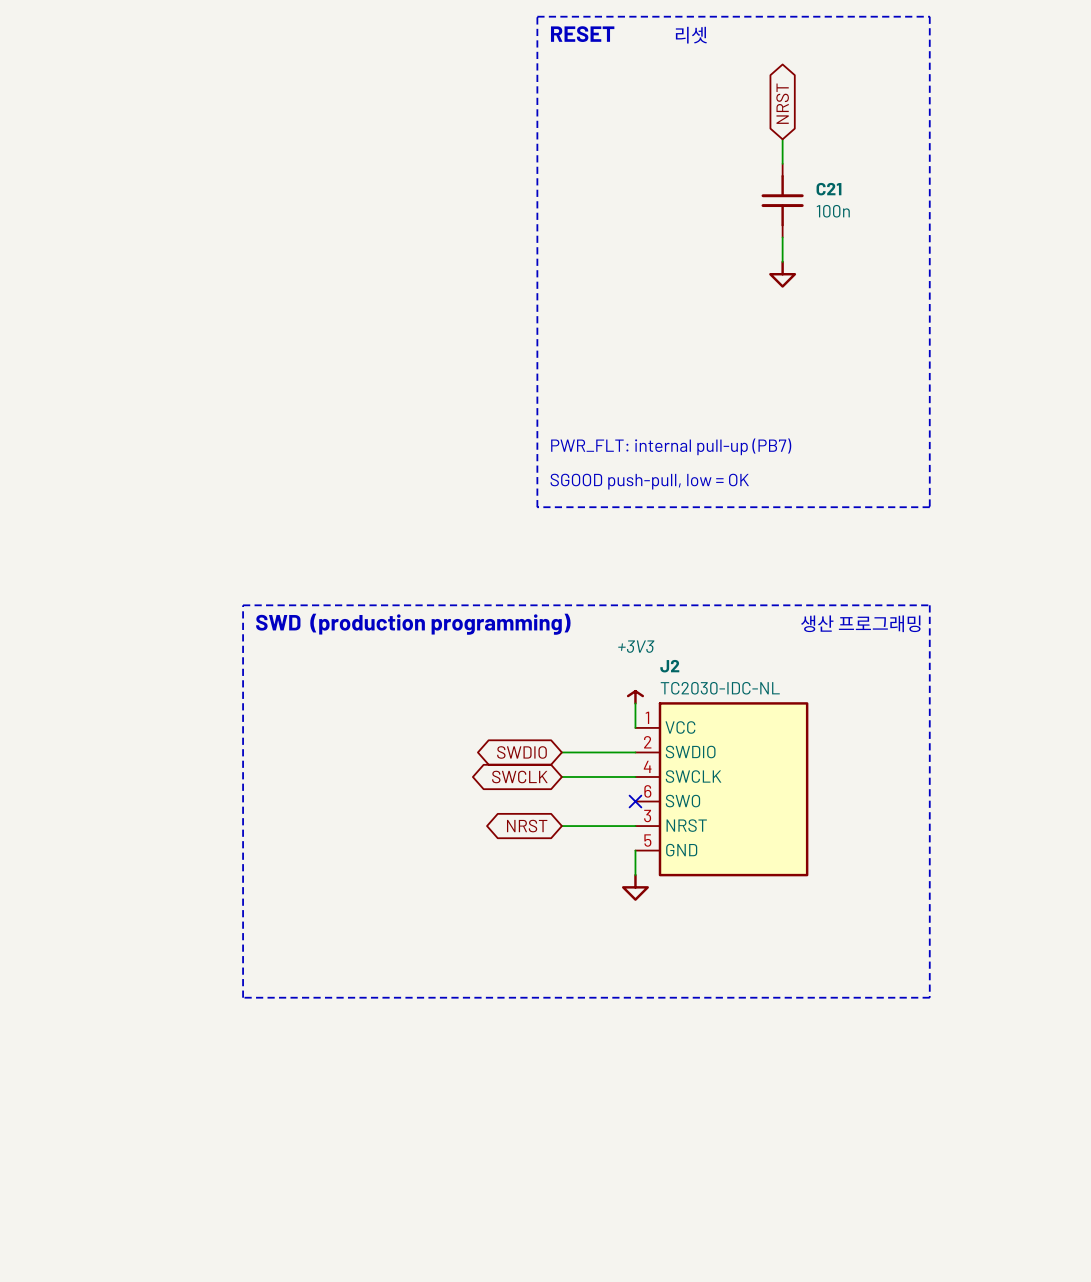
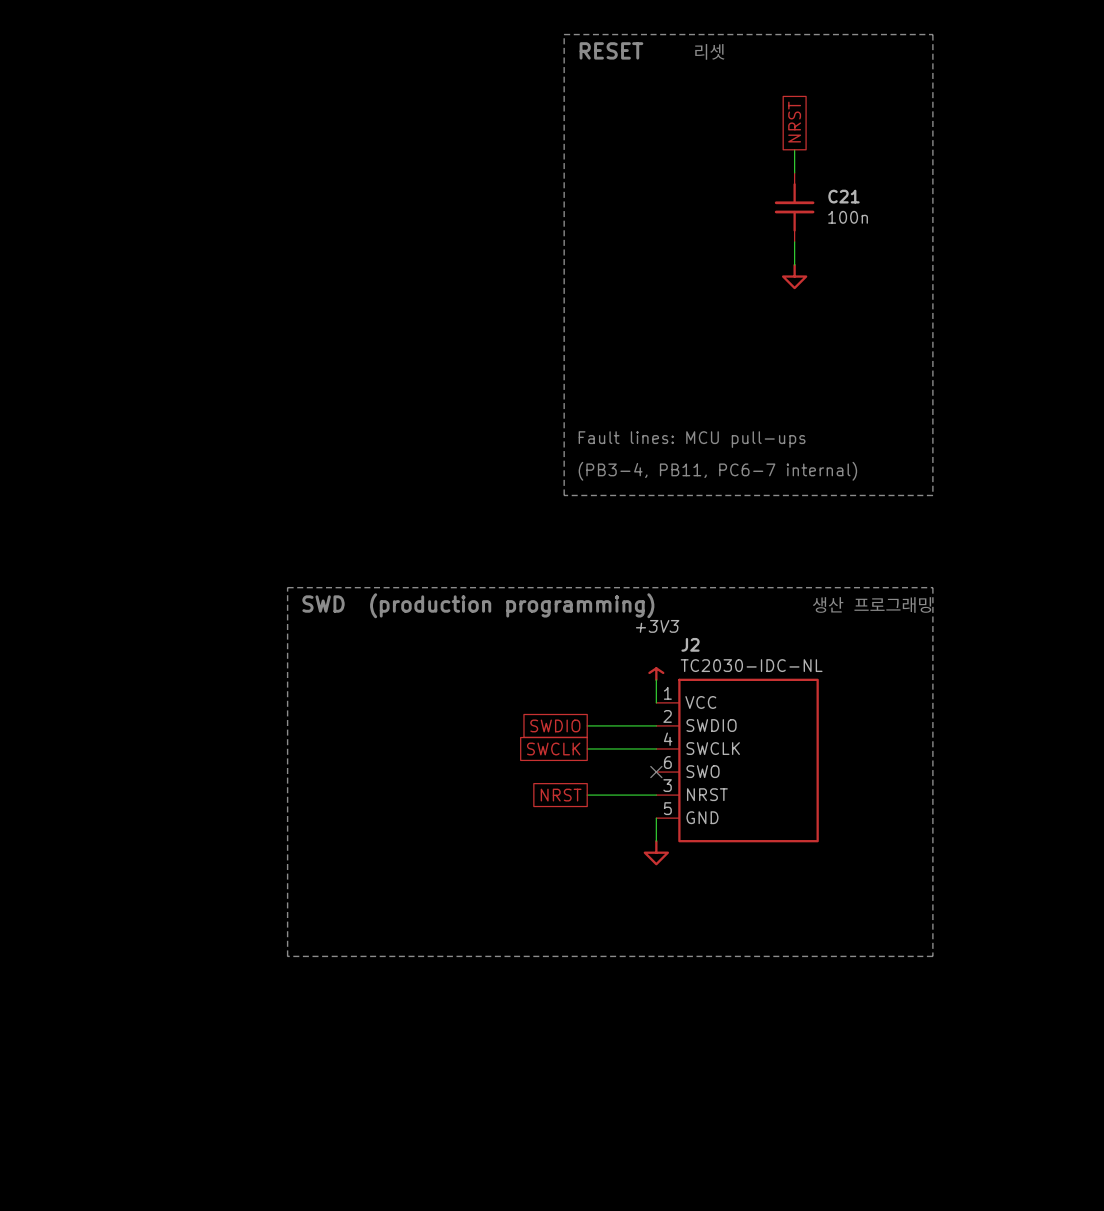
global label shape: bidirectional (782, 103) -> passive (794, 122)
text: PWR_FLT: internal pull-up (PB7) (671, 446) -> Fault lines: MCU pull-ups (692, 439)
text: SGOOD push-pull, low = OK (649, 481) -> (PB3-4, PB11, PC6-7 internal) (717, 471)
global label shape: bidirectional (521, 752) -> passive (555, 725)
global label shape: bidirectional (519, 777) -> passive (553, 748)
global label shape: bidirectional (527, 826) -> passive (561, 795)

